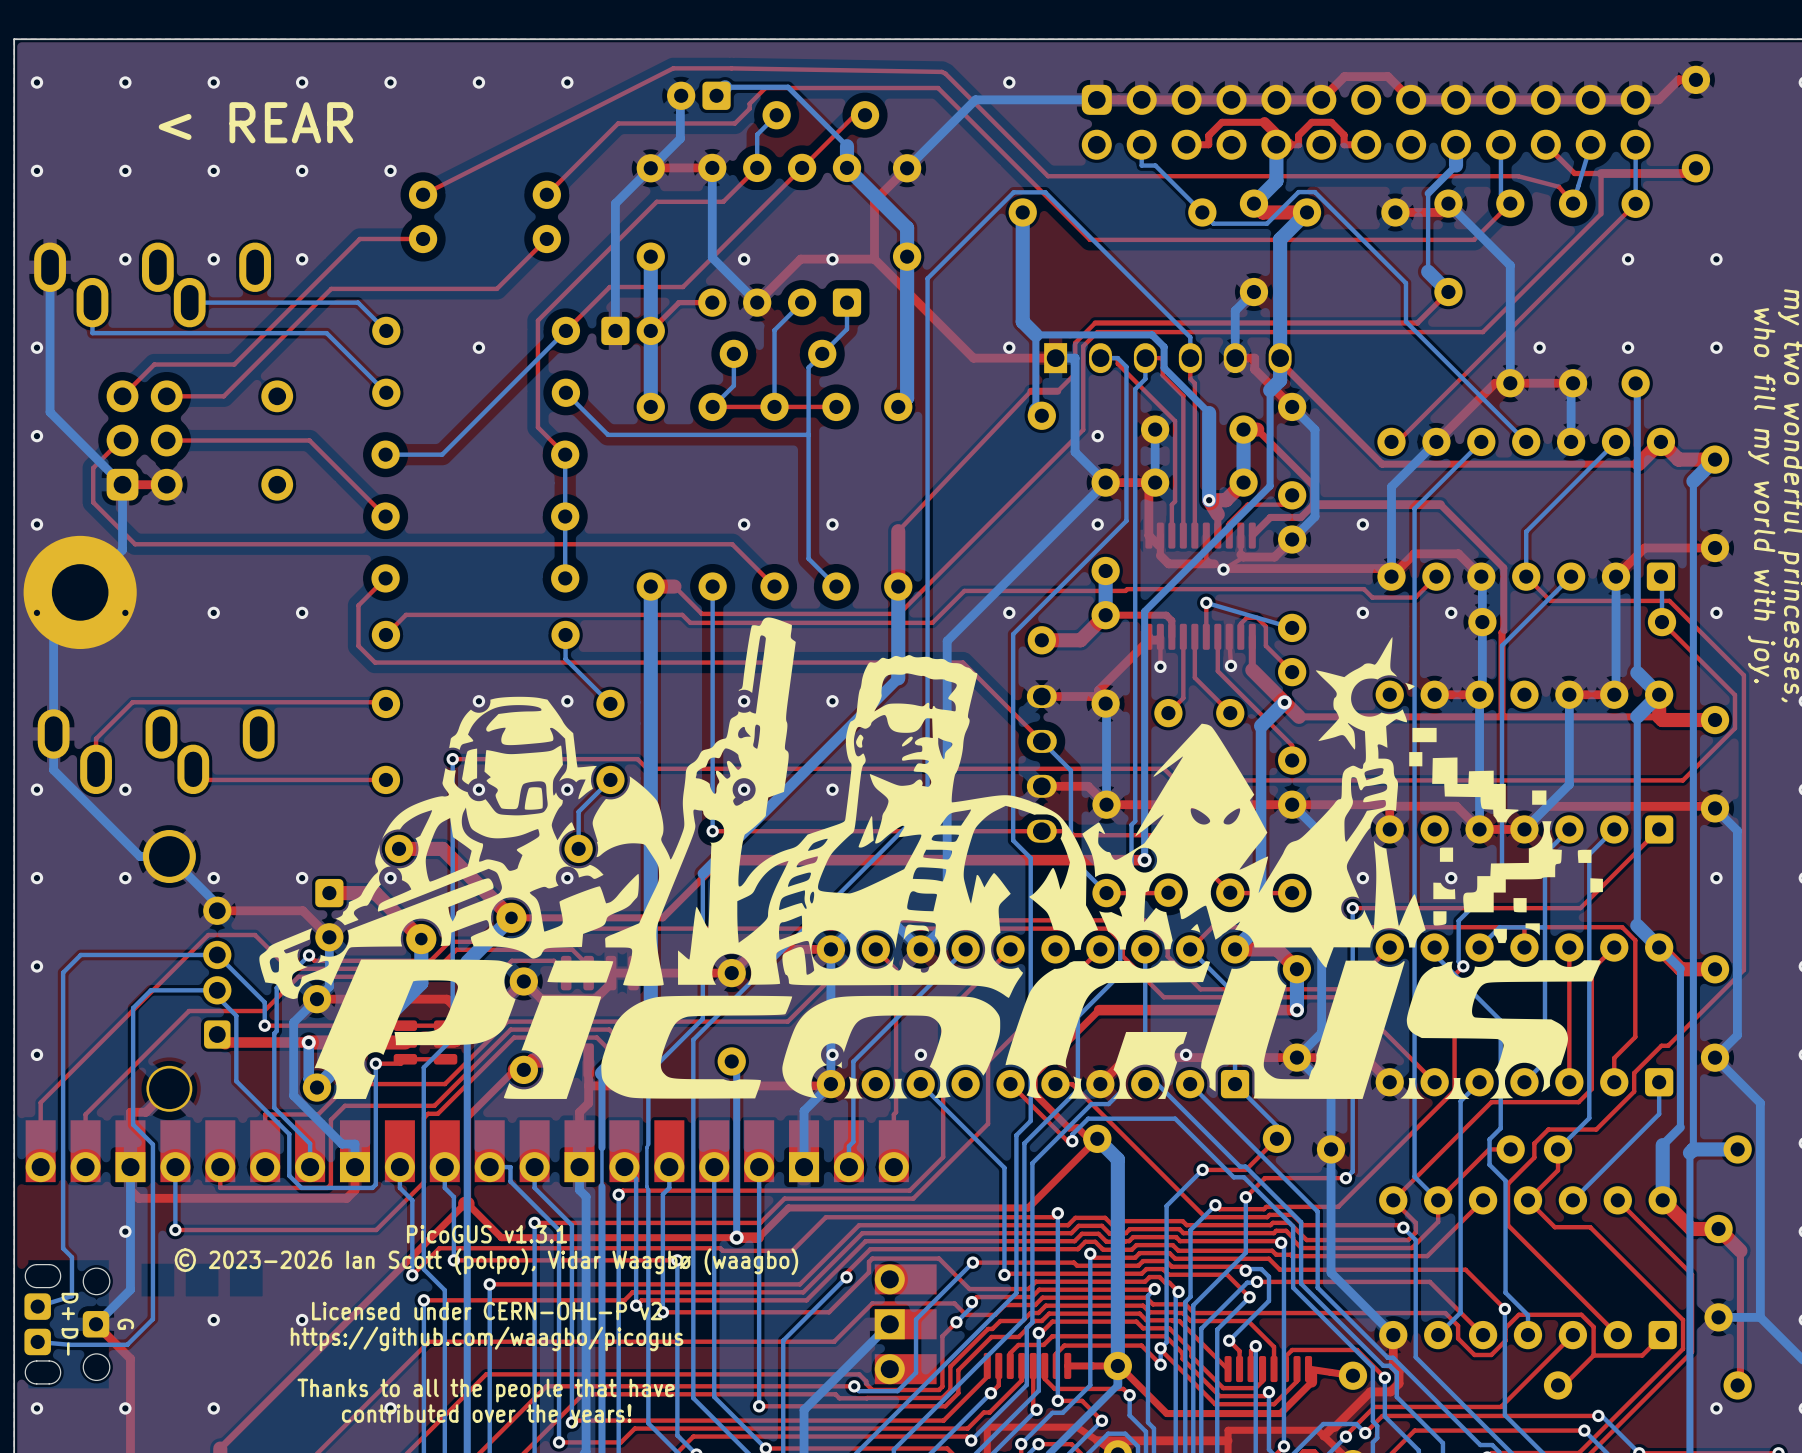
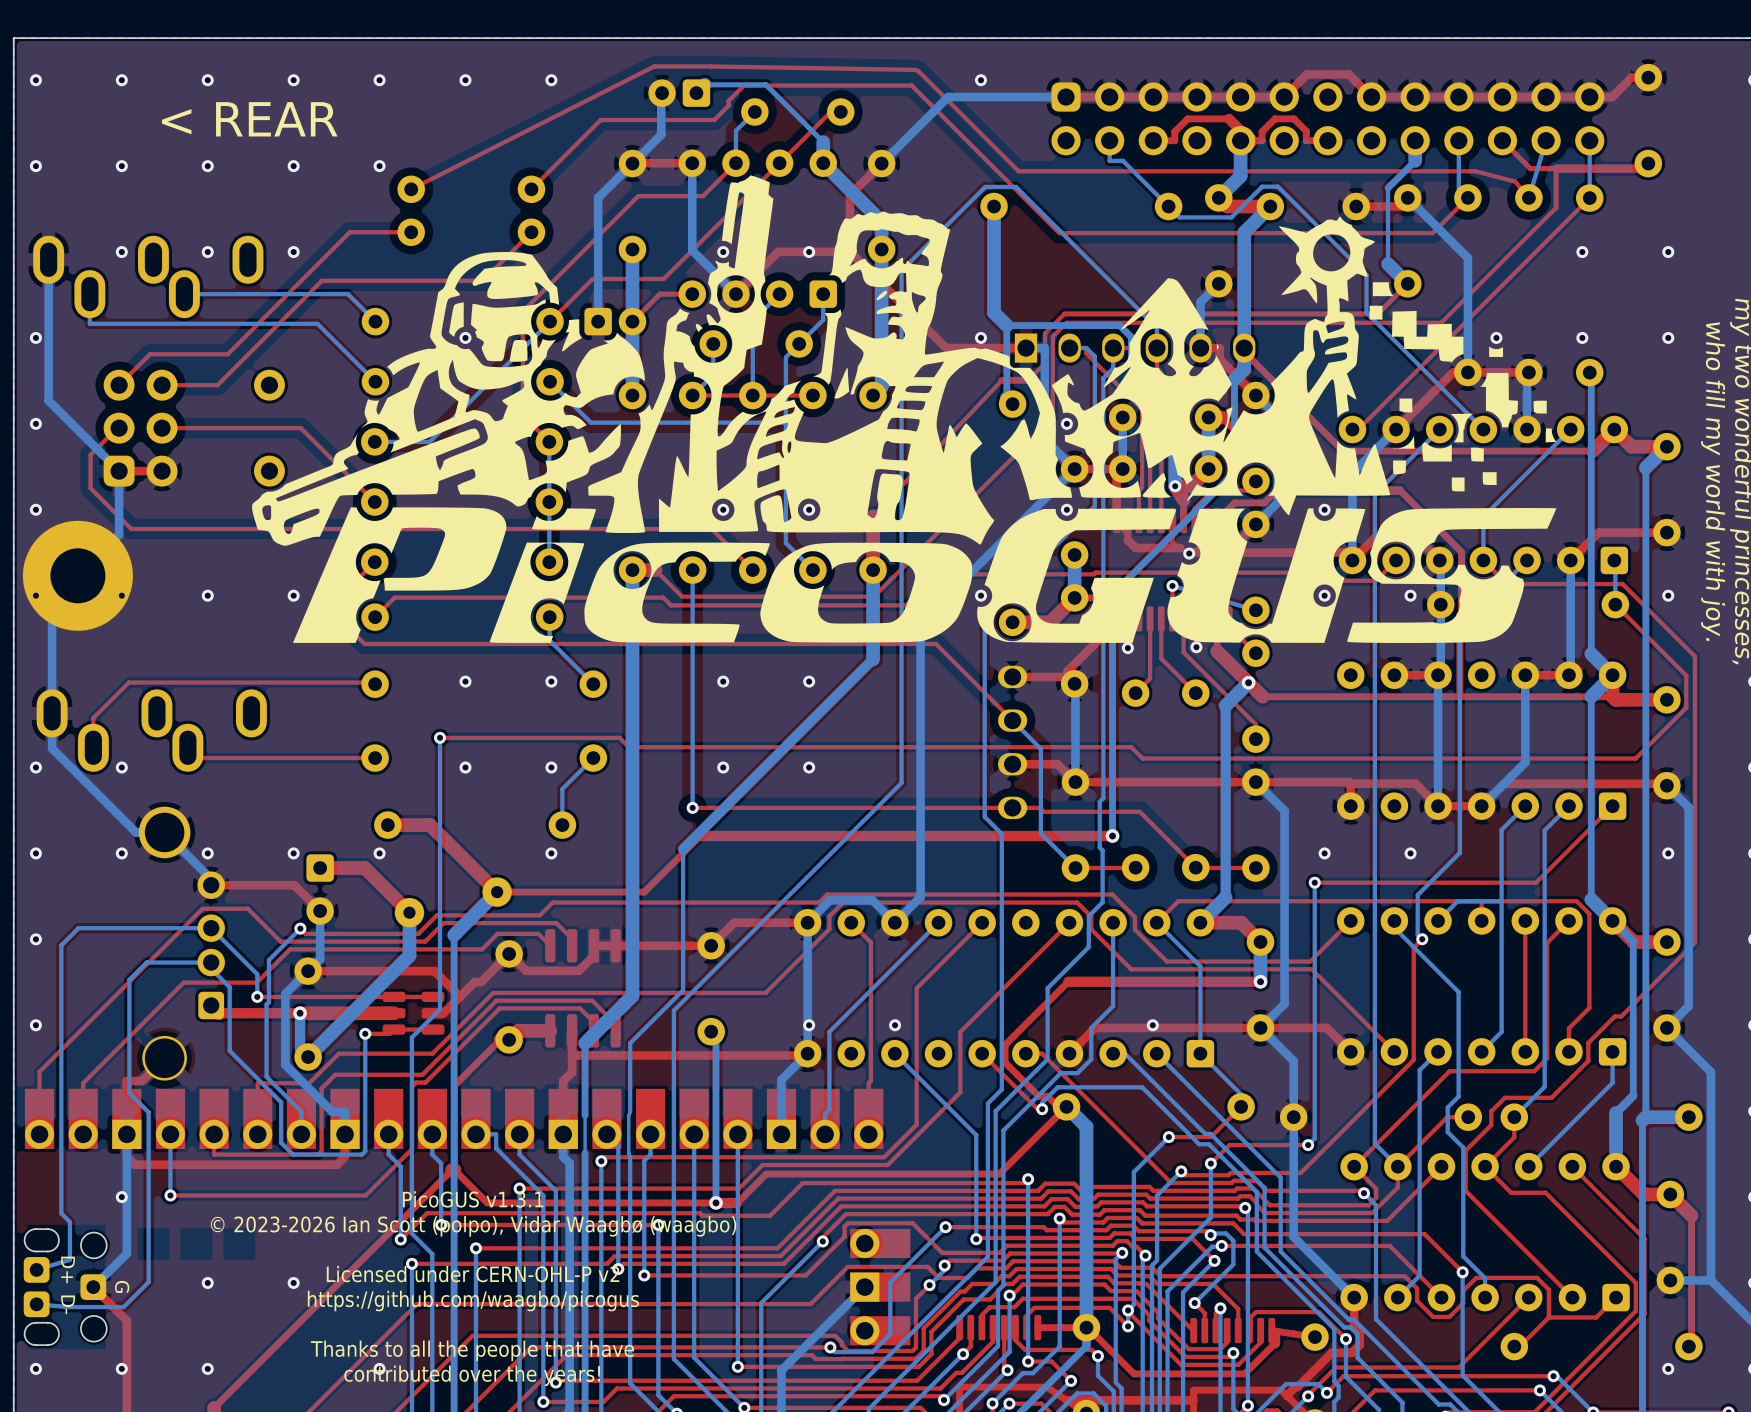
drawing: none -> [252, 175, 1557, 643]
drawing: [259, 617, 1603, 1100] -> none
drawing position: (907, 741) -> (881, 295)
drawing position: (1415, 759) -> (1376, 312)
drawing position: (533, 798) -> (518, 350)
drawing position: (866, 831) -> (841, 383)
drawing position: (1520, 905) -> (1458, 484)
drawing position: (1439, 918) -> (1399, 467)

